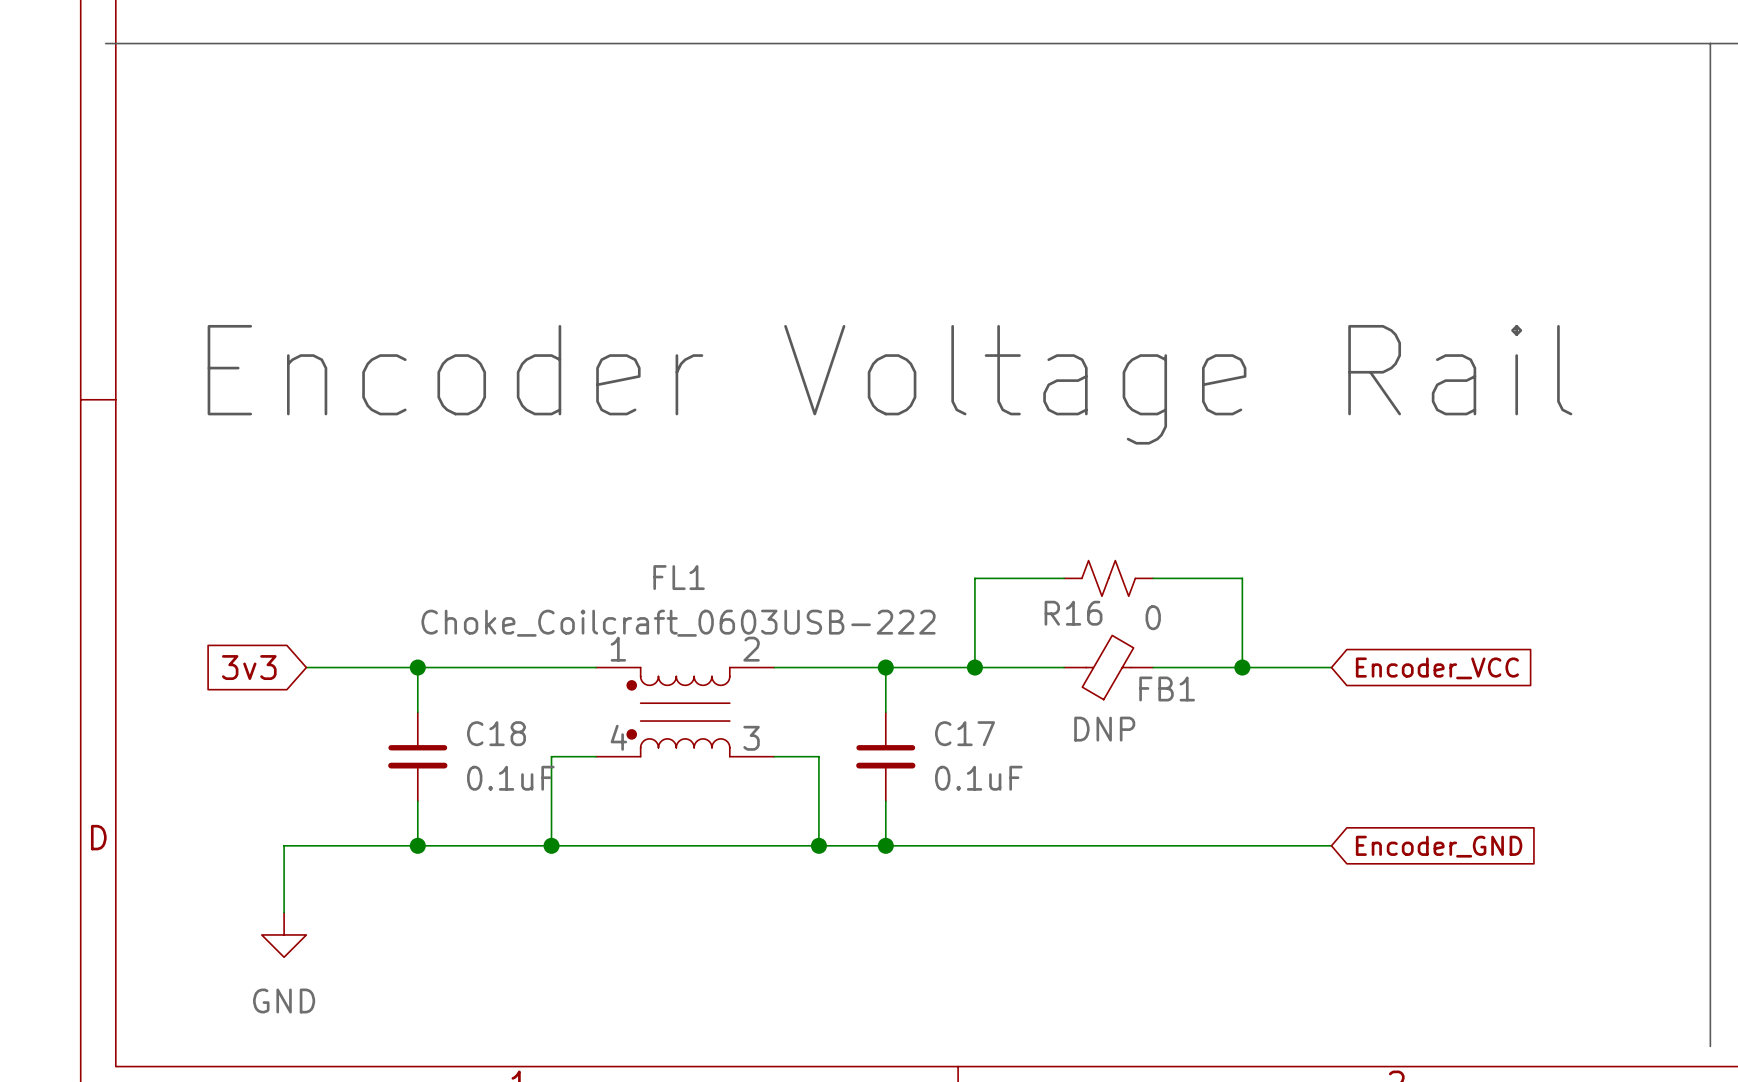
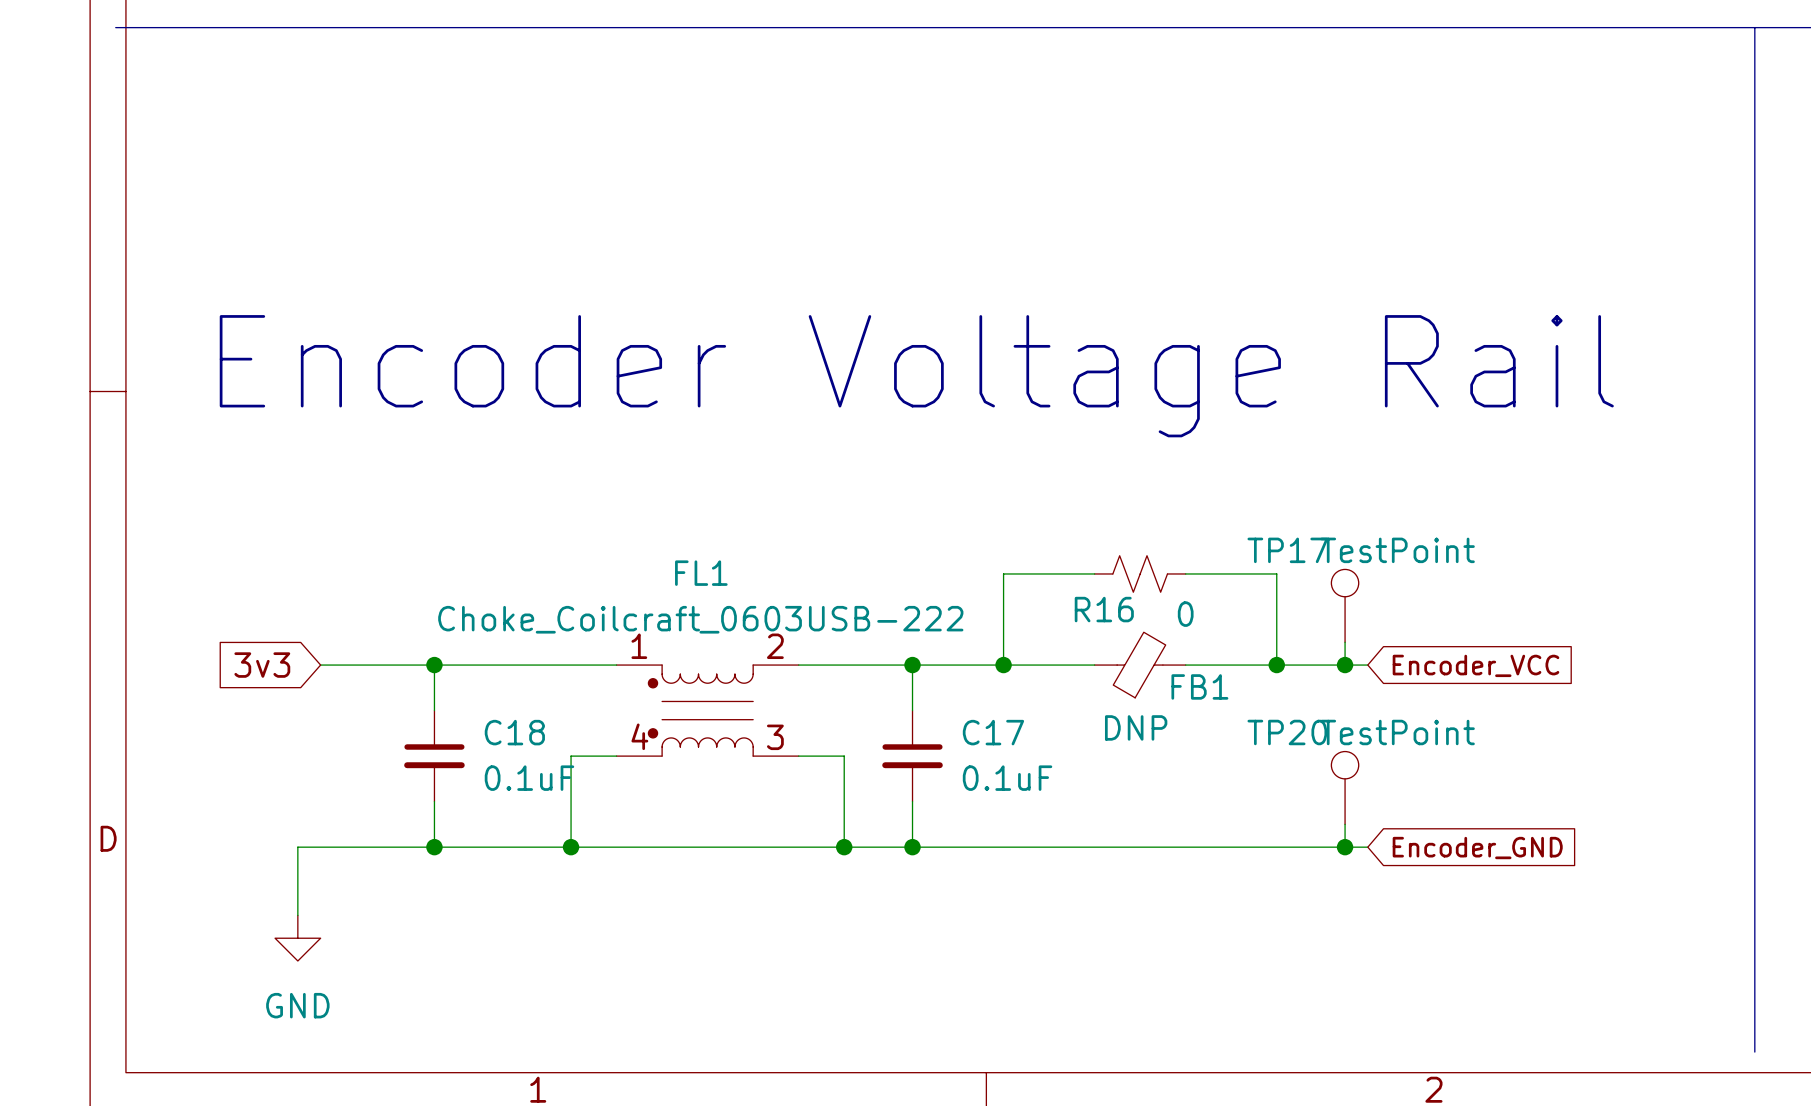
TP17: none -> TestPoint (1345, 605)
wire: none -> (1345, 642) (1345, 665)
junction: none -> (1345, 665)
TP20: none -> TestPoint (1345, 787)
wire: none -> (1345, 824) (1345, 847)
junction: none -> (1345, 847)

